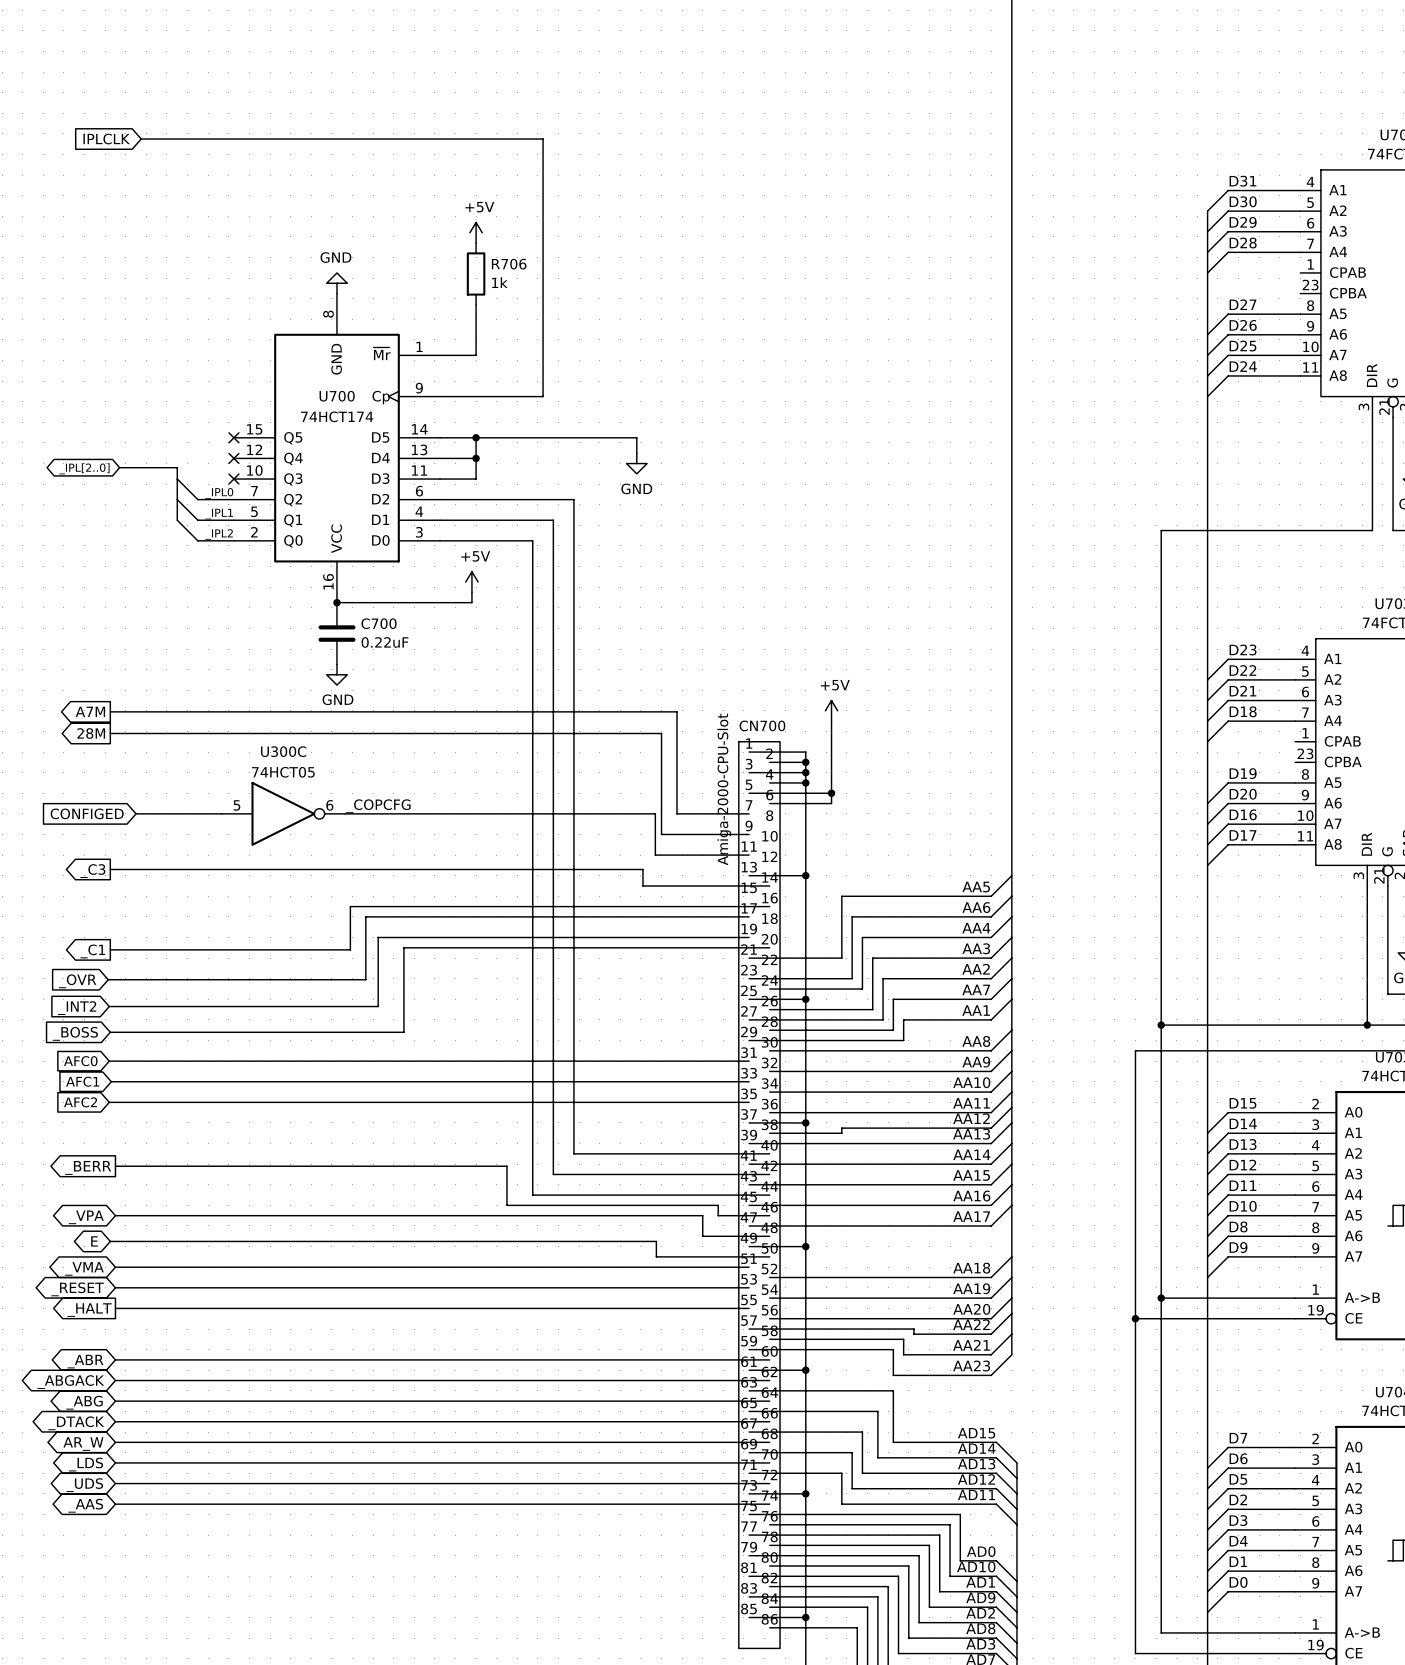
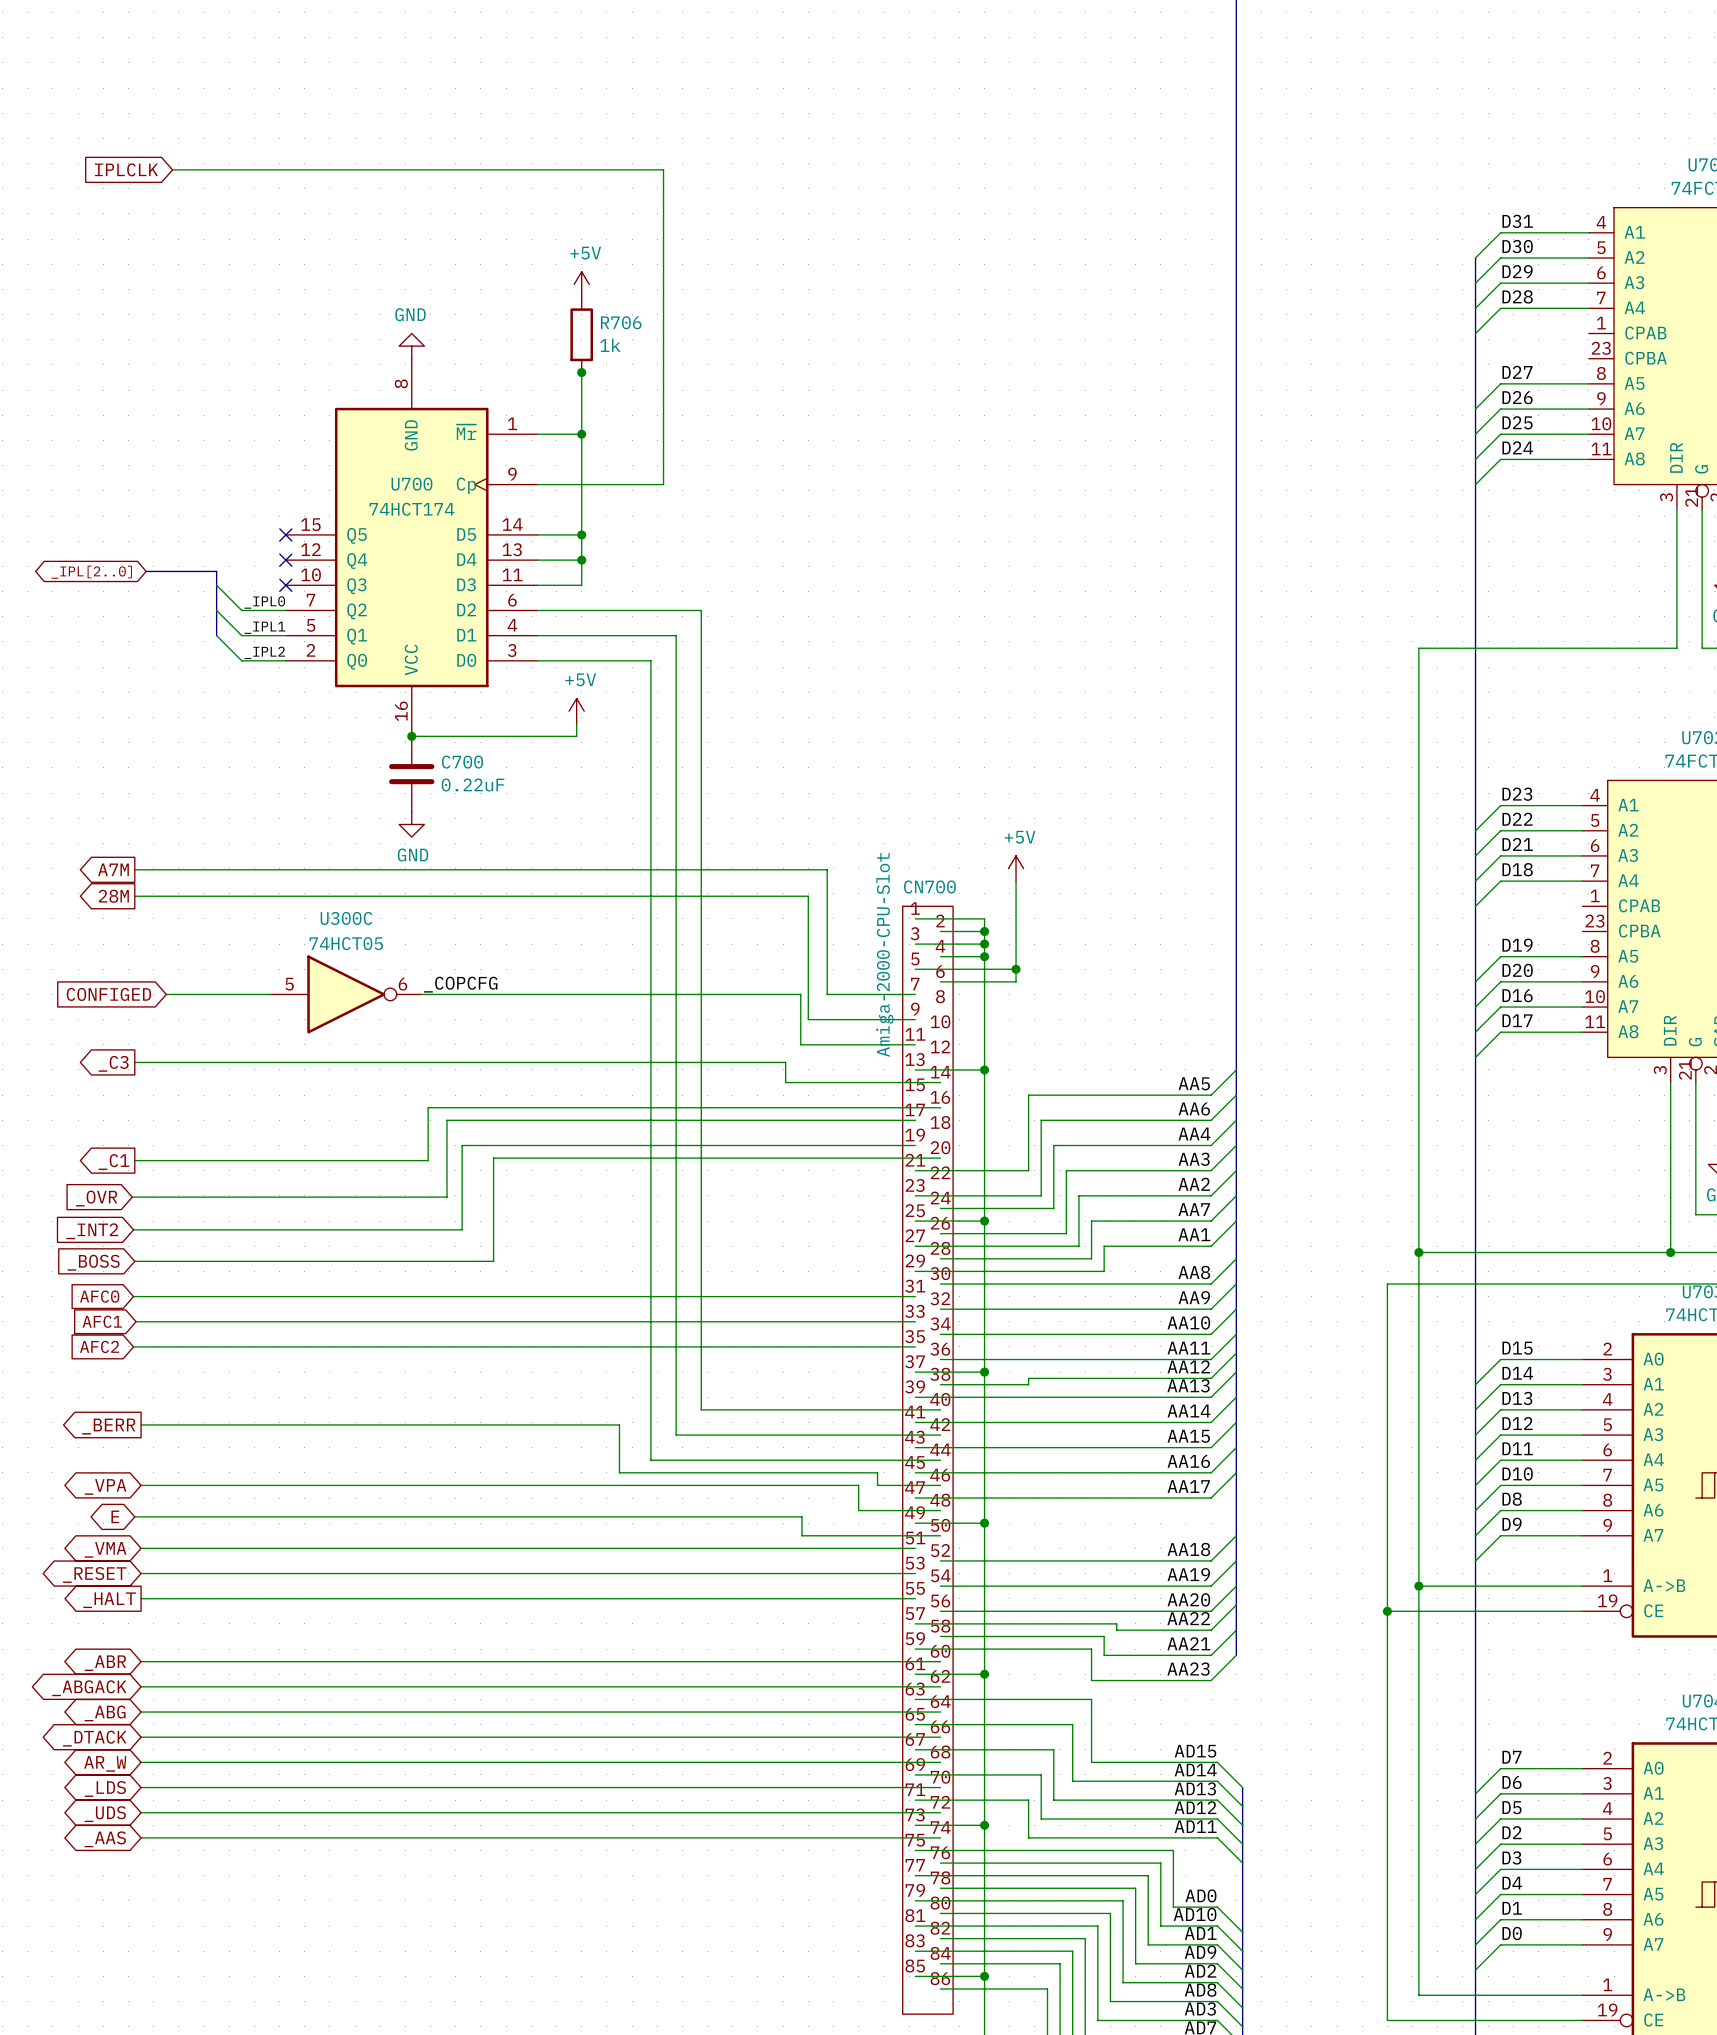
junction: none -> (581, 372)
junction: none -> (581, 434)
wire: (476, 437) (636, 437) (636, 453) -> (581, 534) (581, 434)
power symbol: GND (636, 463) -> none

